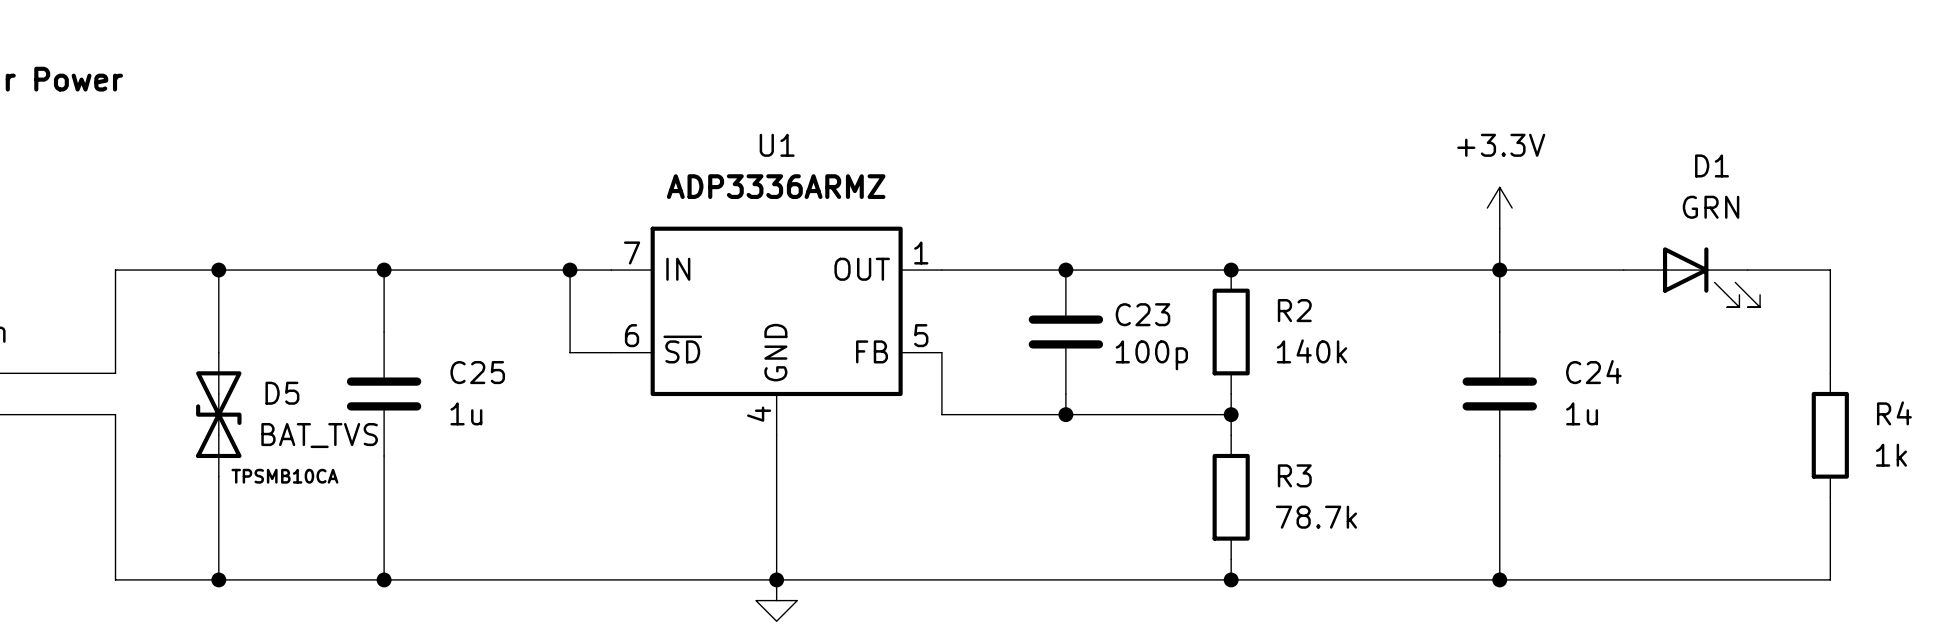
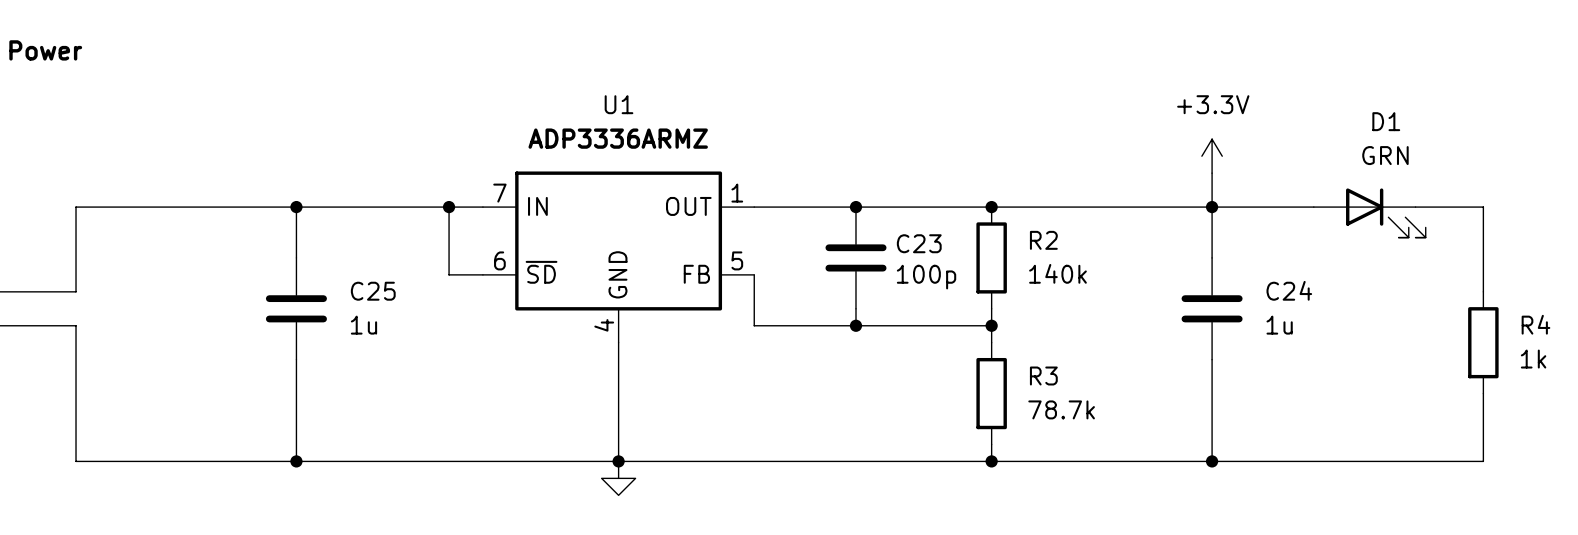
wire: (218, 270) (218, 352) -> none
junction: (218, 270) -> none
D5: BAT_TVS (218, 414) -> none
wire: (218, 476) (218, 579) -> none
text: TPSMB10CA (284, 476) -> none
junction: (218, 579) -> none

